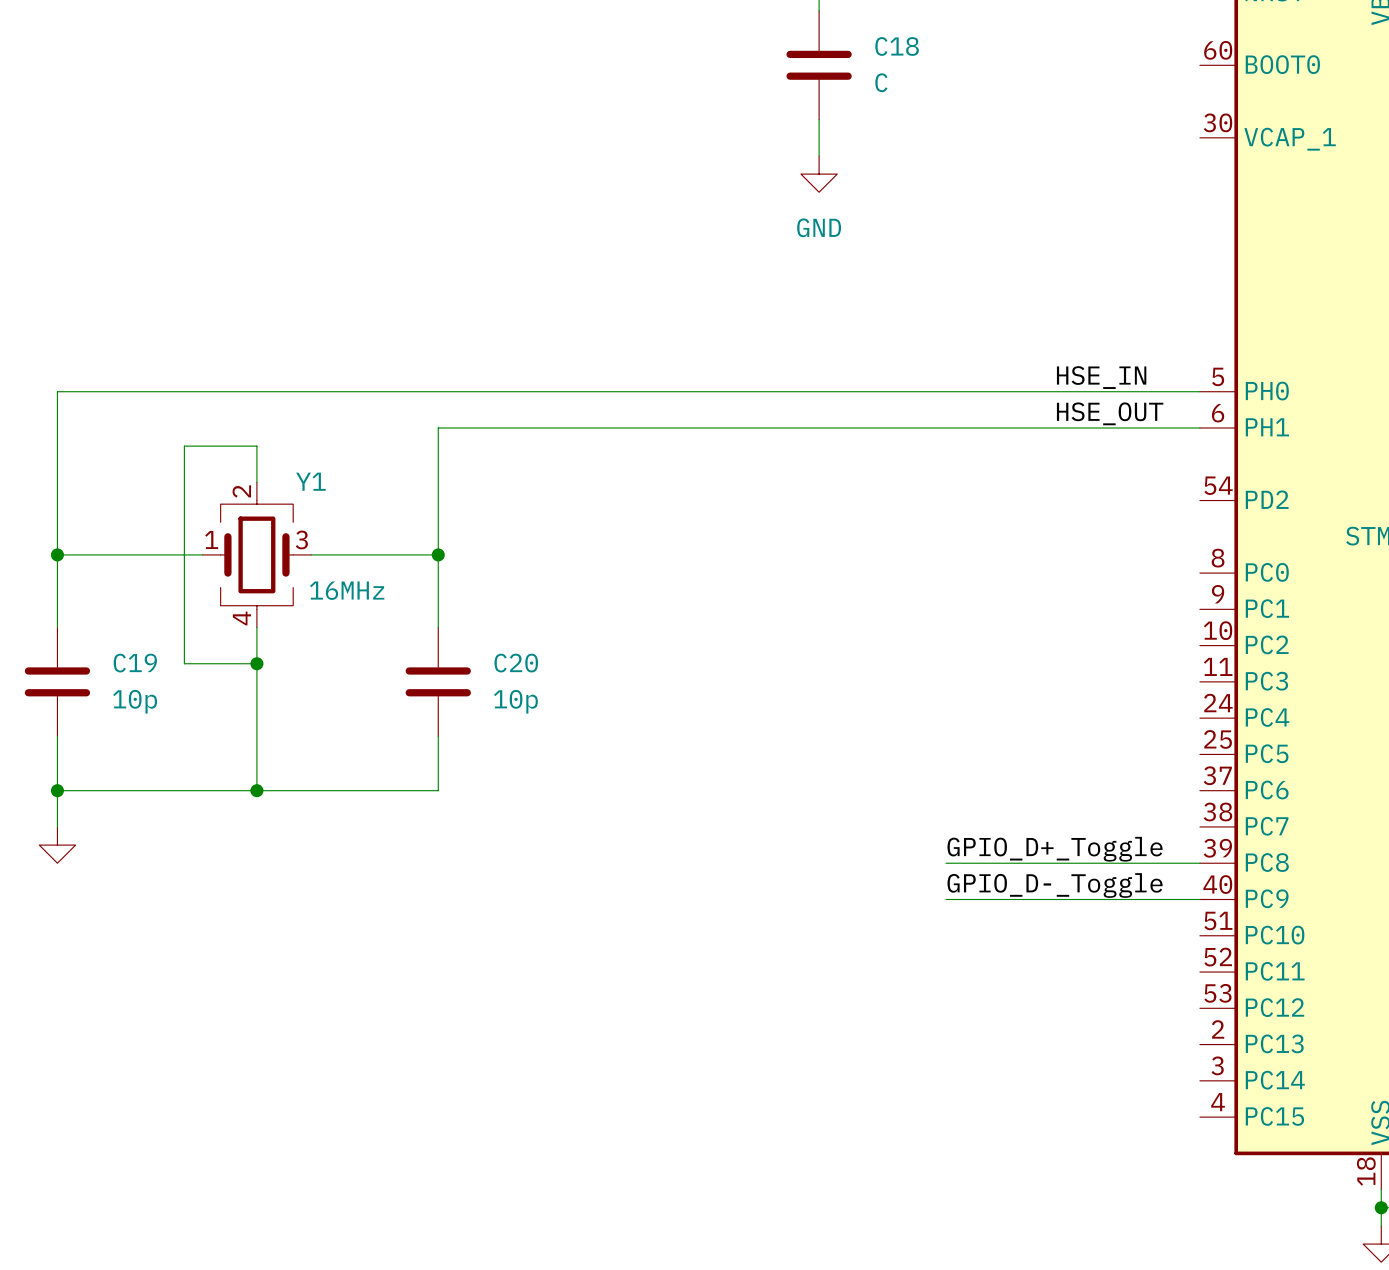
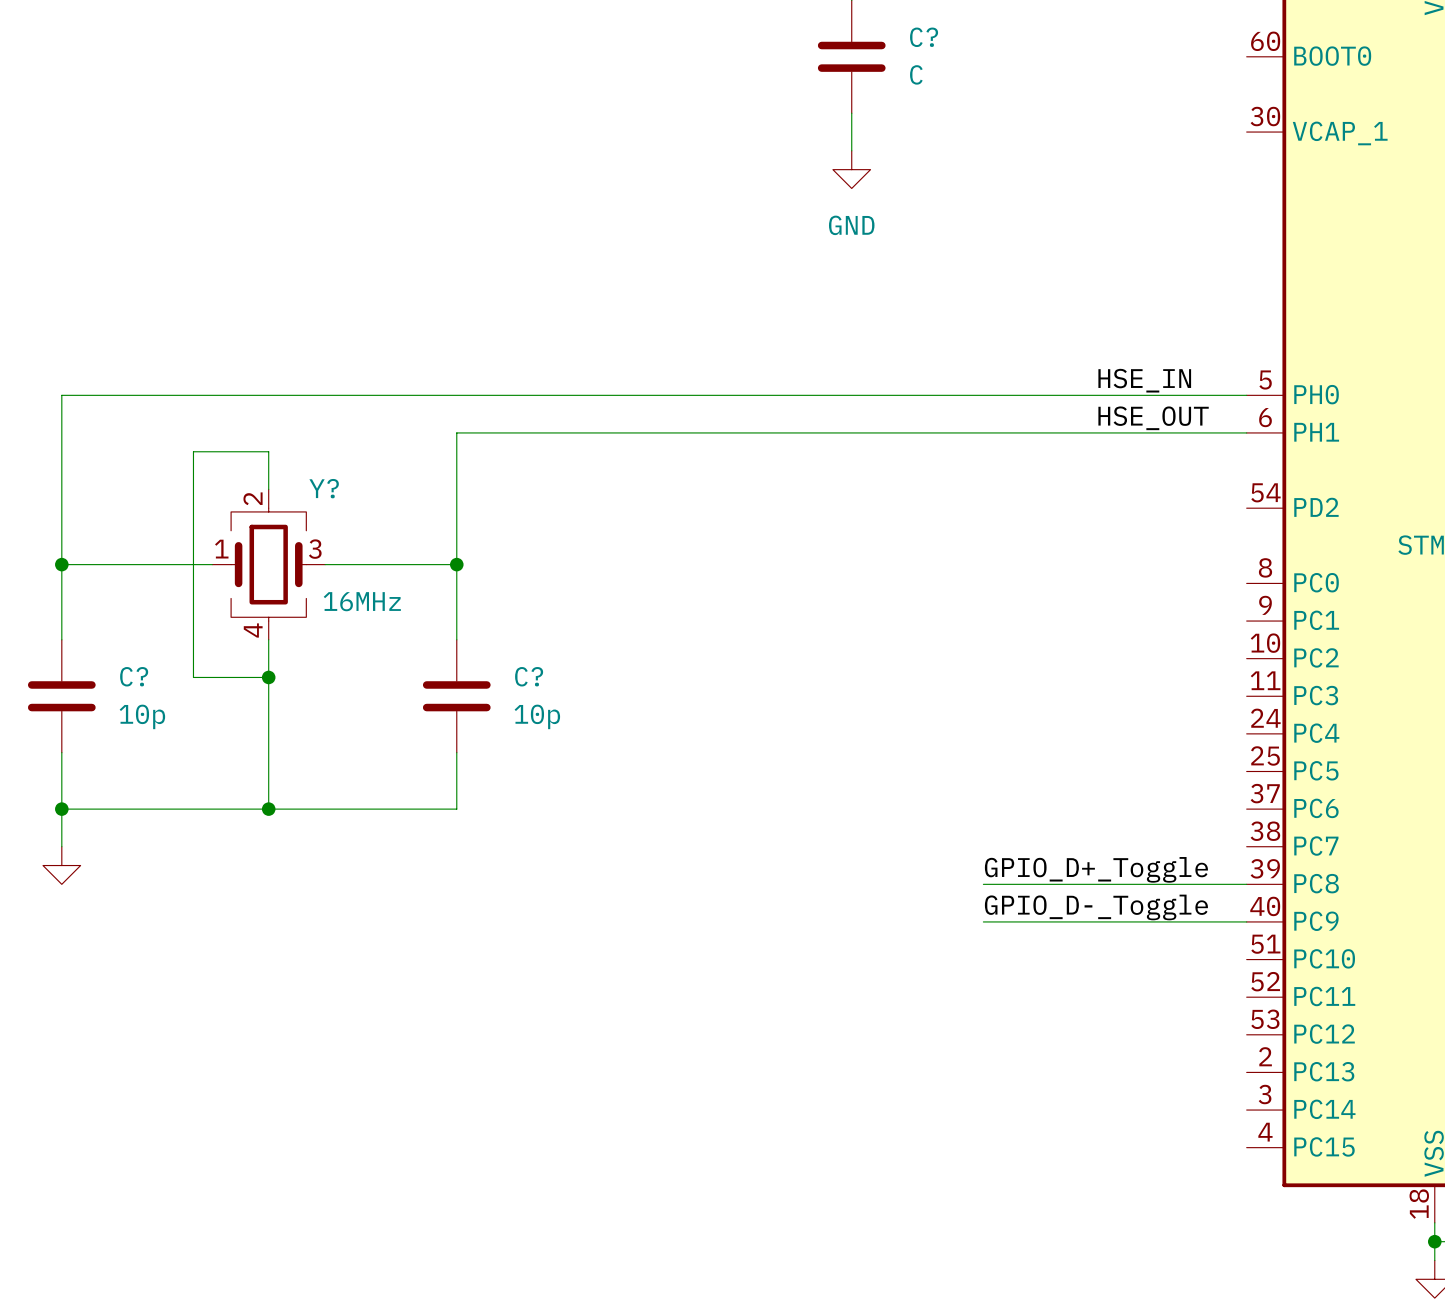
C18 name: C18 (897, 46) -> C? (924, 37)
Y1 name: Y1 (310, 481) -> Y? (324, 488)
C19 name: C19 (135, 663) -> C? (134, 676)
C20 name: C20 (516, 663) -> C? (529, 676)

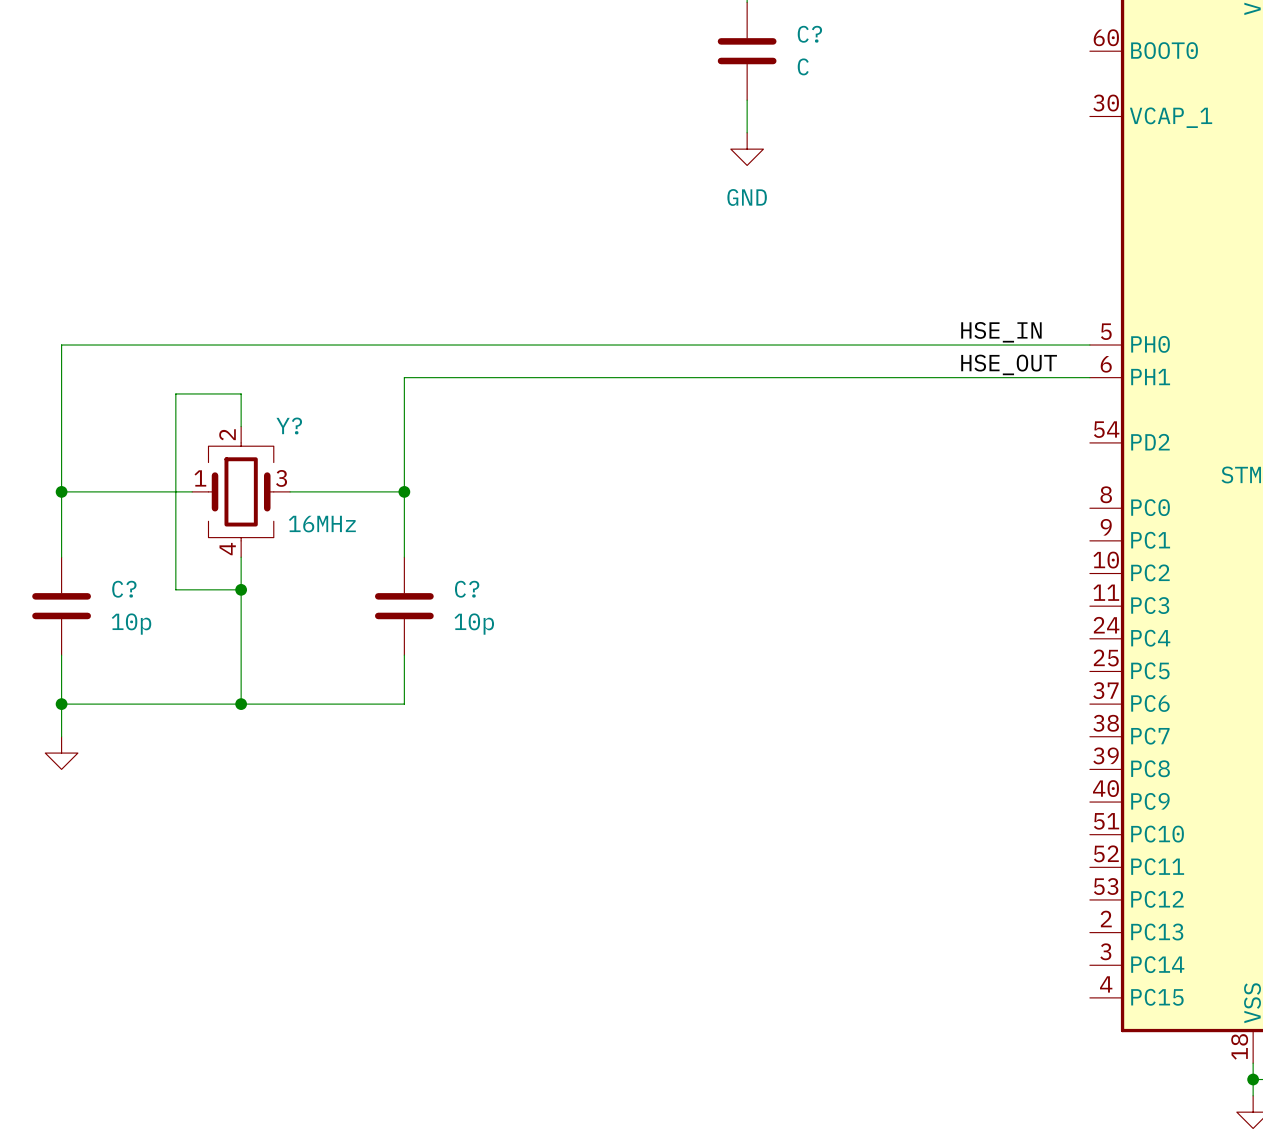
label: GPIO_D+_Toggle (1096, 869) -> none
wire: (983, 884) (1246, 884) -> none
label: GPIO_D-_Toggle (1096, 907) -> none
wire: (983, 921) (1246, 921) -> none

